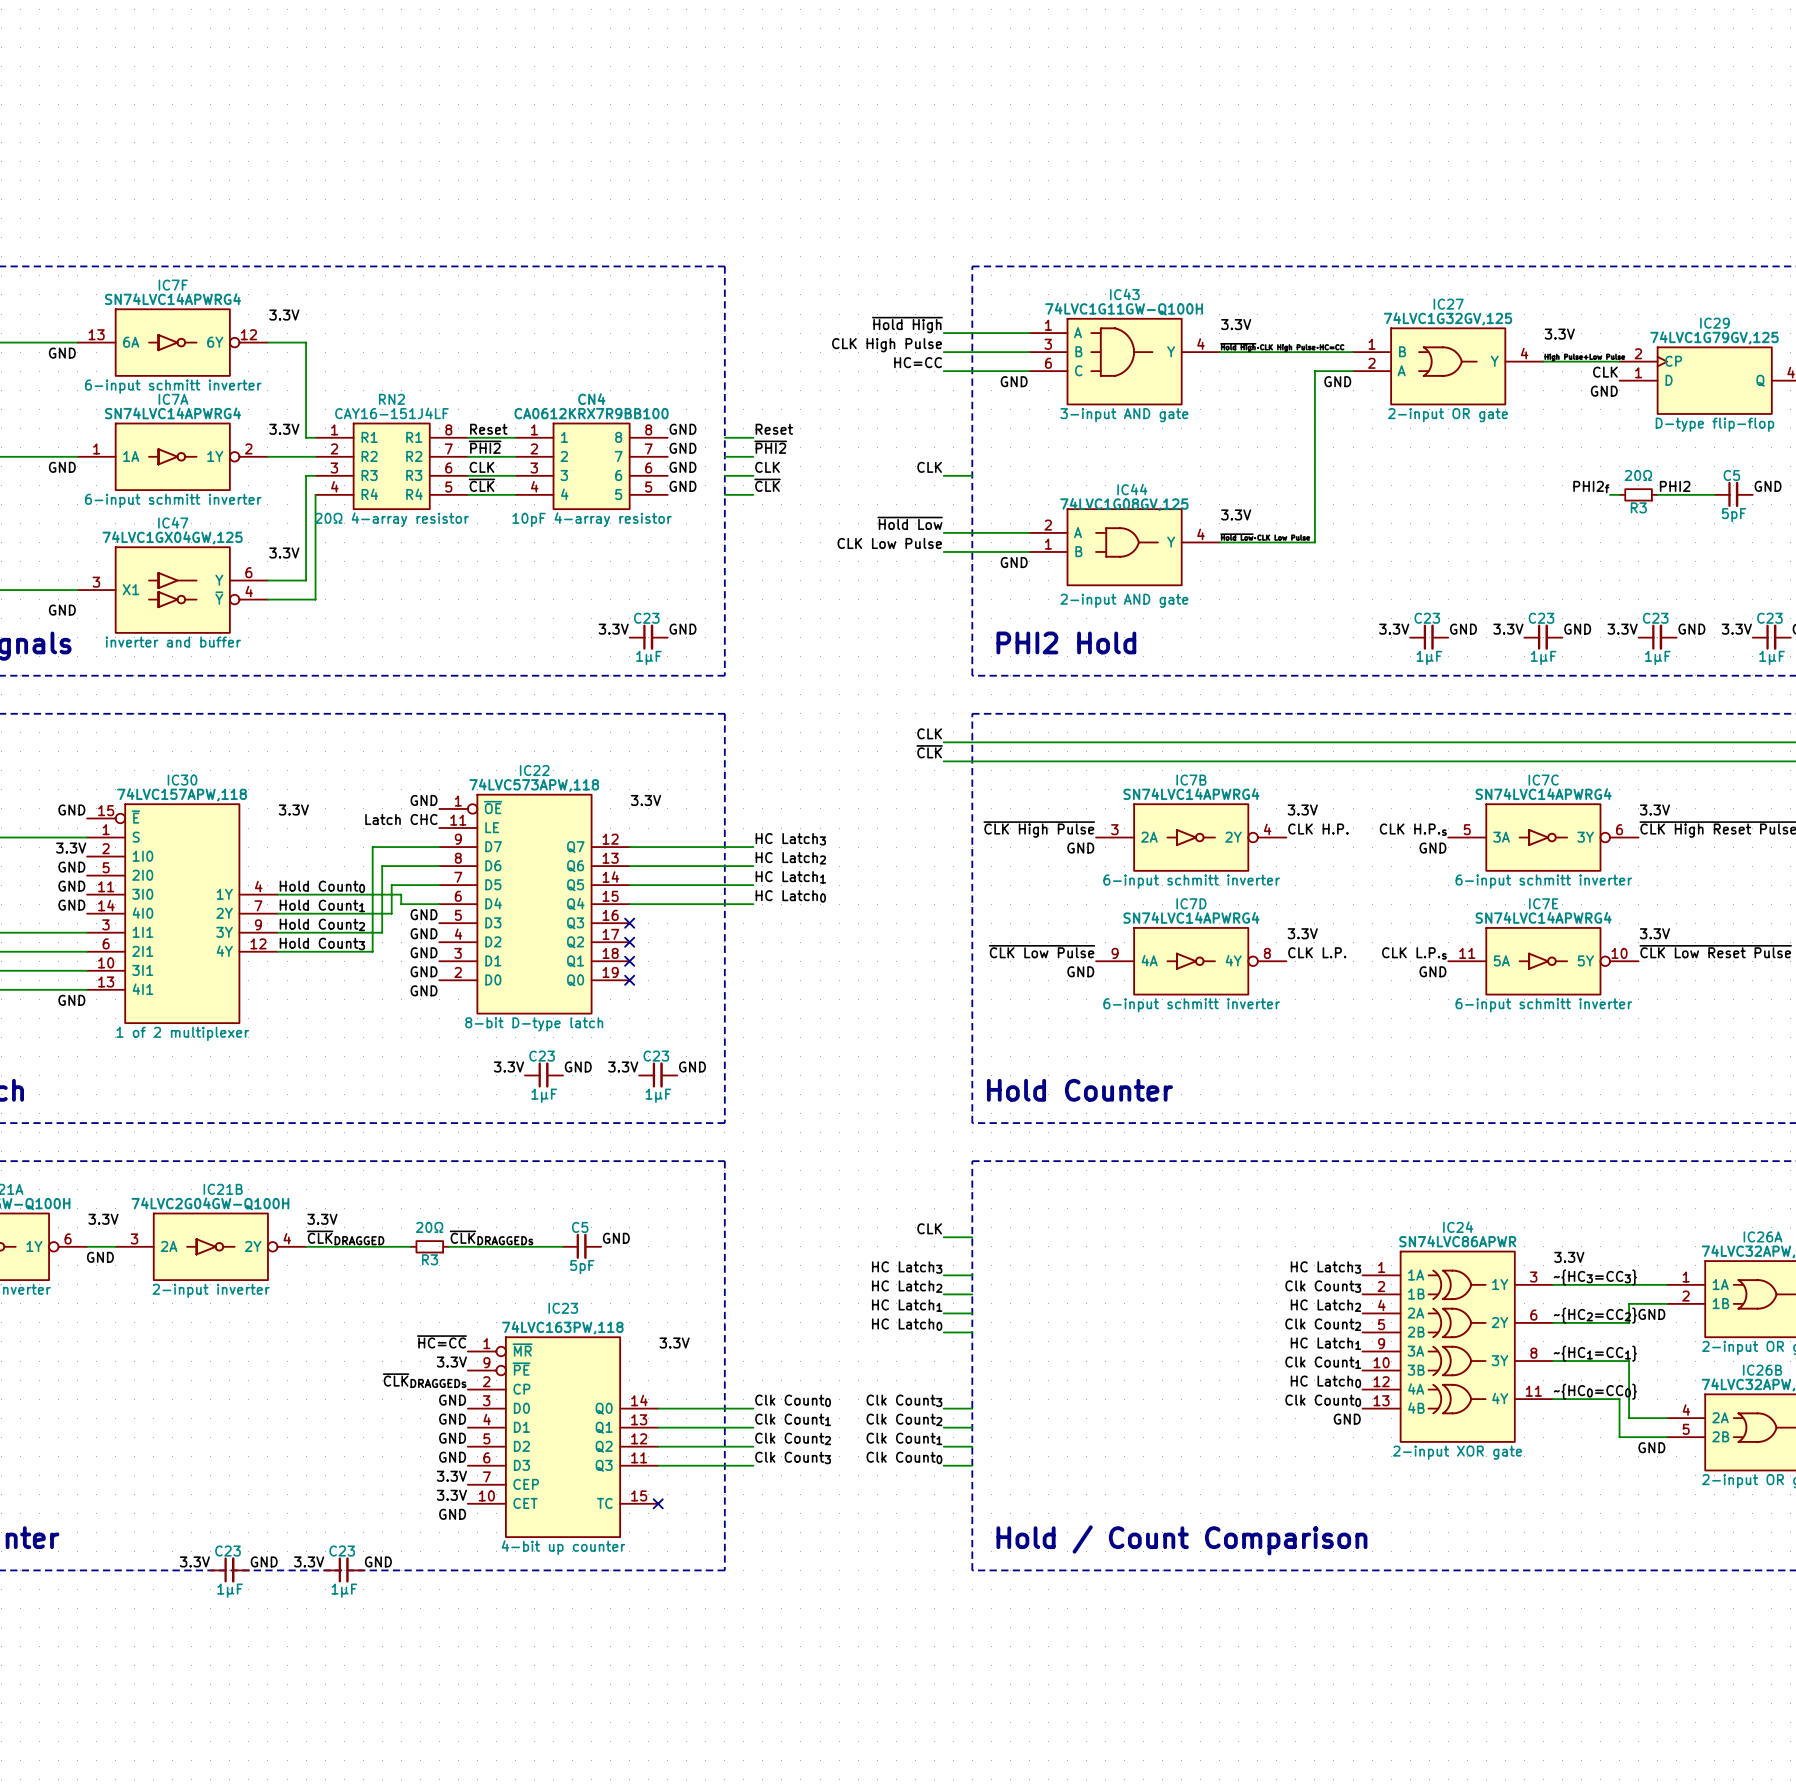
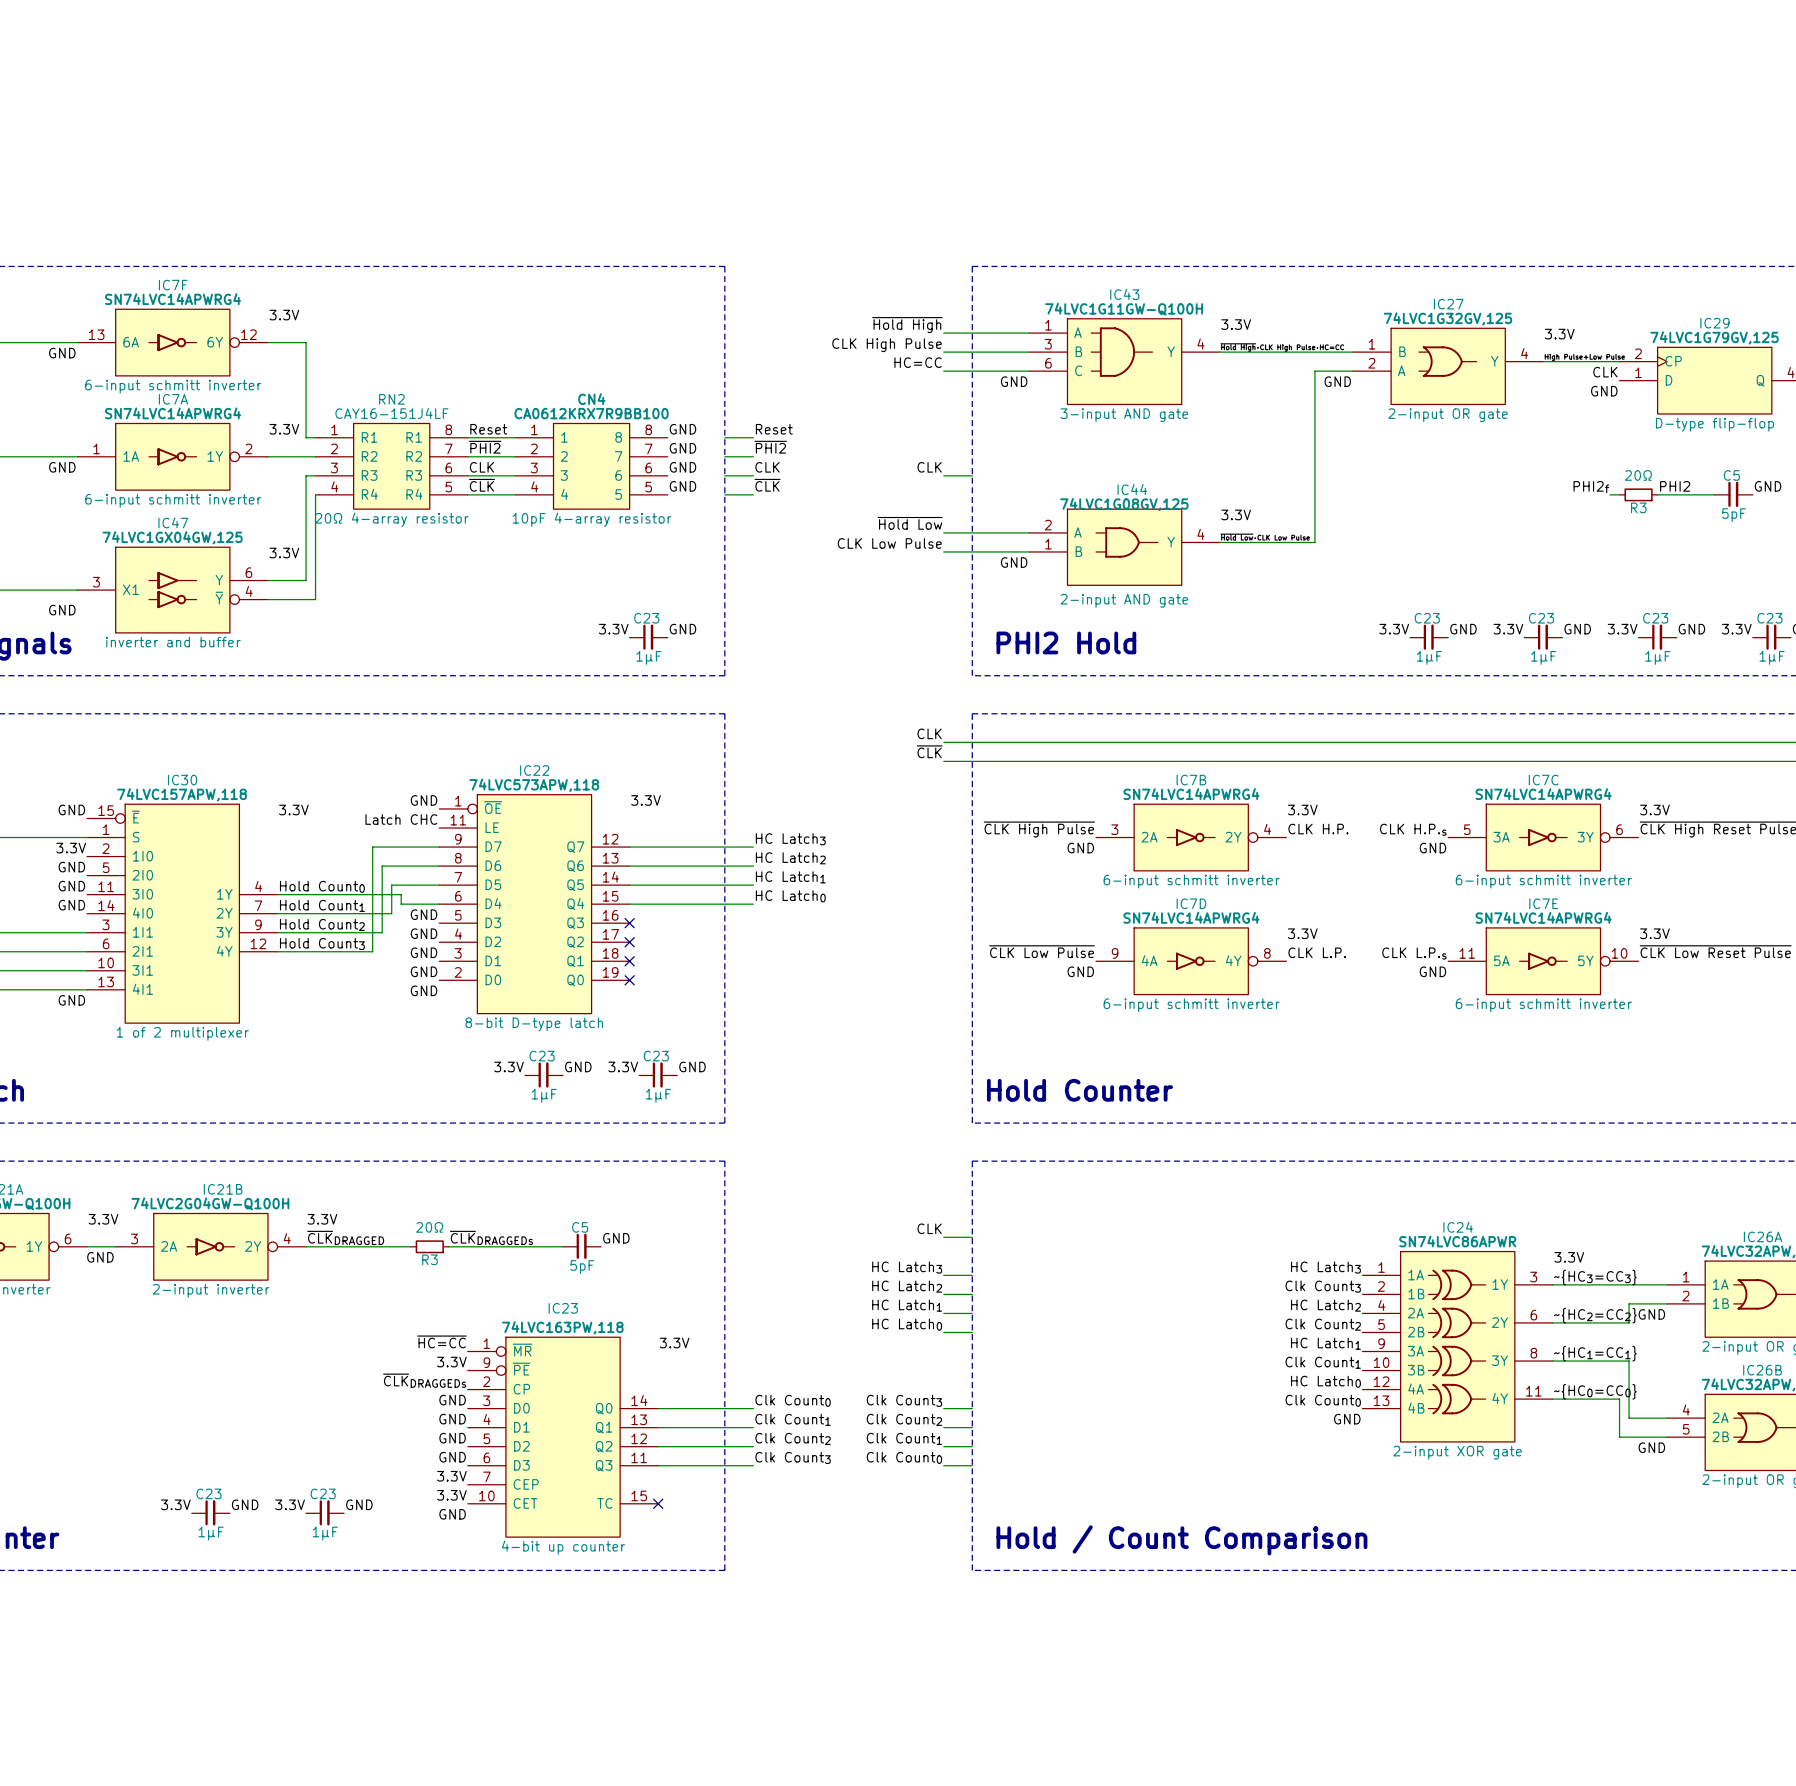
label: none -> 3.3V (175, 1504)
label: none -> GND (245, 1504)
label: none -> 3.3V (290, 1504)
label: none -> GND (359, 1504)
C23: none -> 1μF (210, 1512)
C23: none -> 1μF (325, 1512)
label: 3.3V (194, 1561) -> none
label: GND (264, 1561) -> none
label: 3.3V (309, 1561) -> none
label: GND (378, 1561) -> none
C23: 1μF (229, 1569) -> none
C23: 1μF (344, 1569) -> none

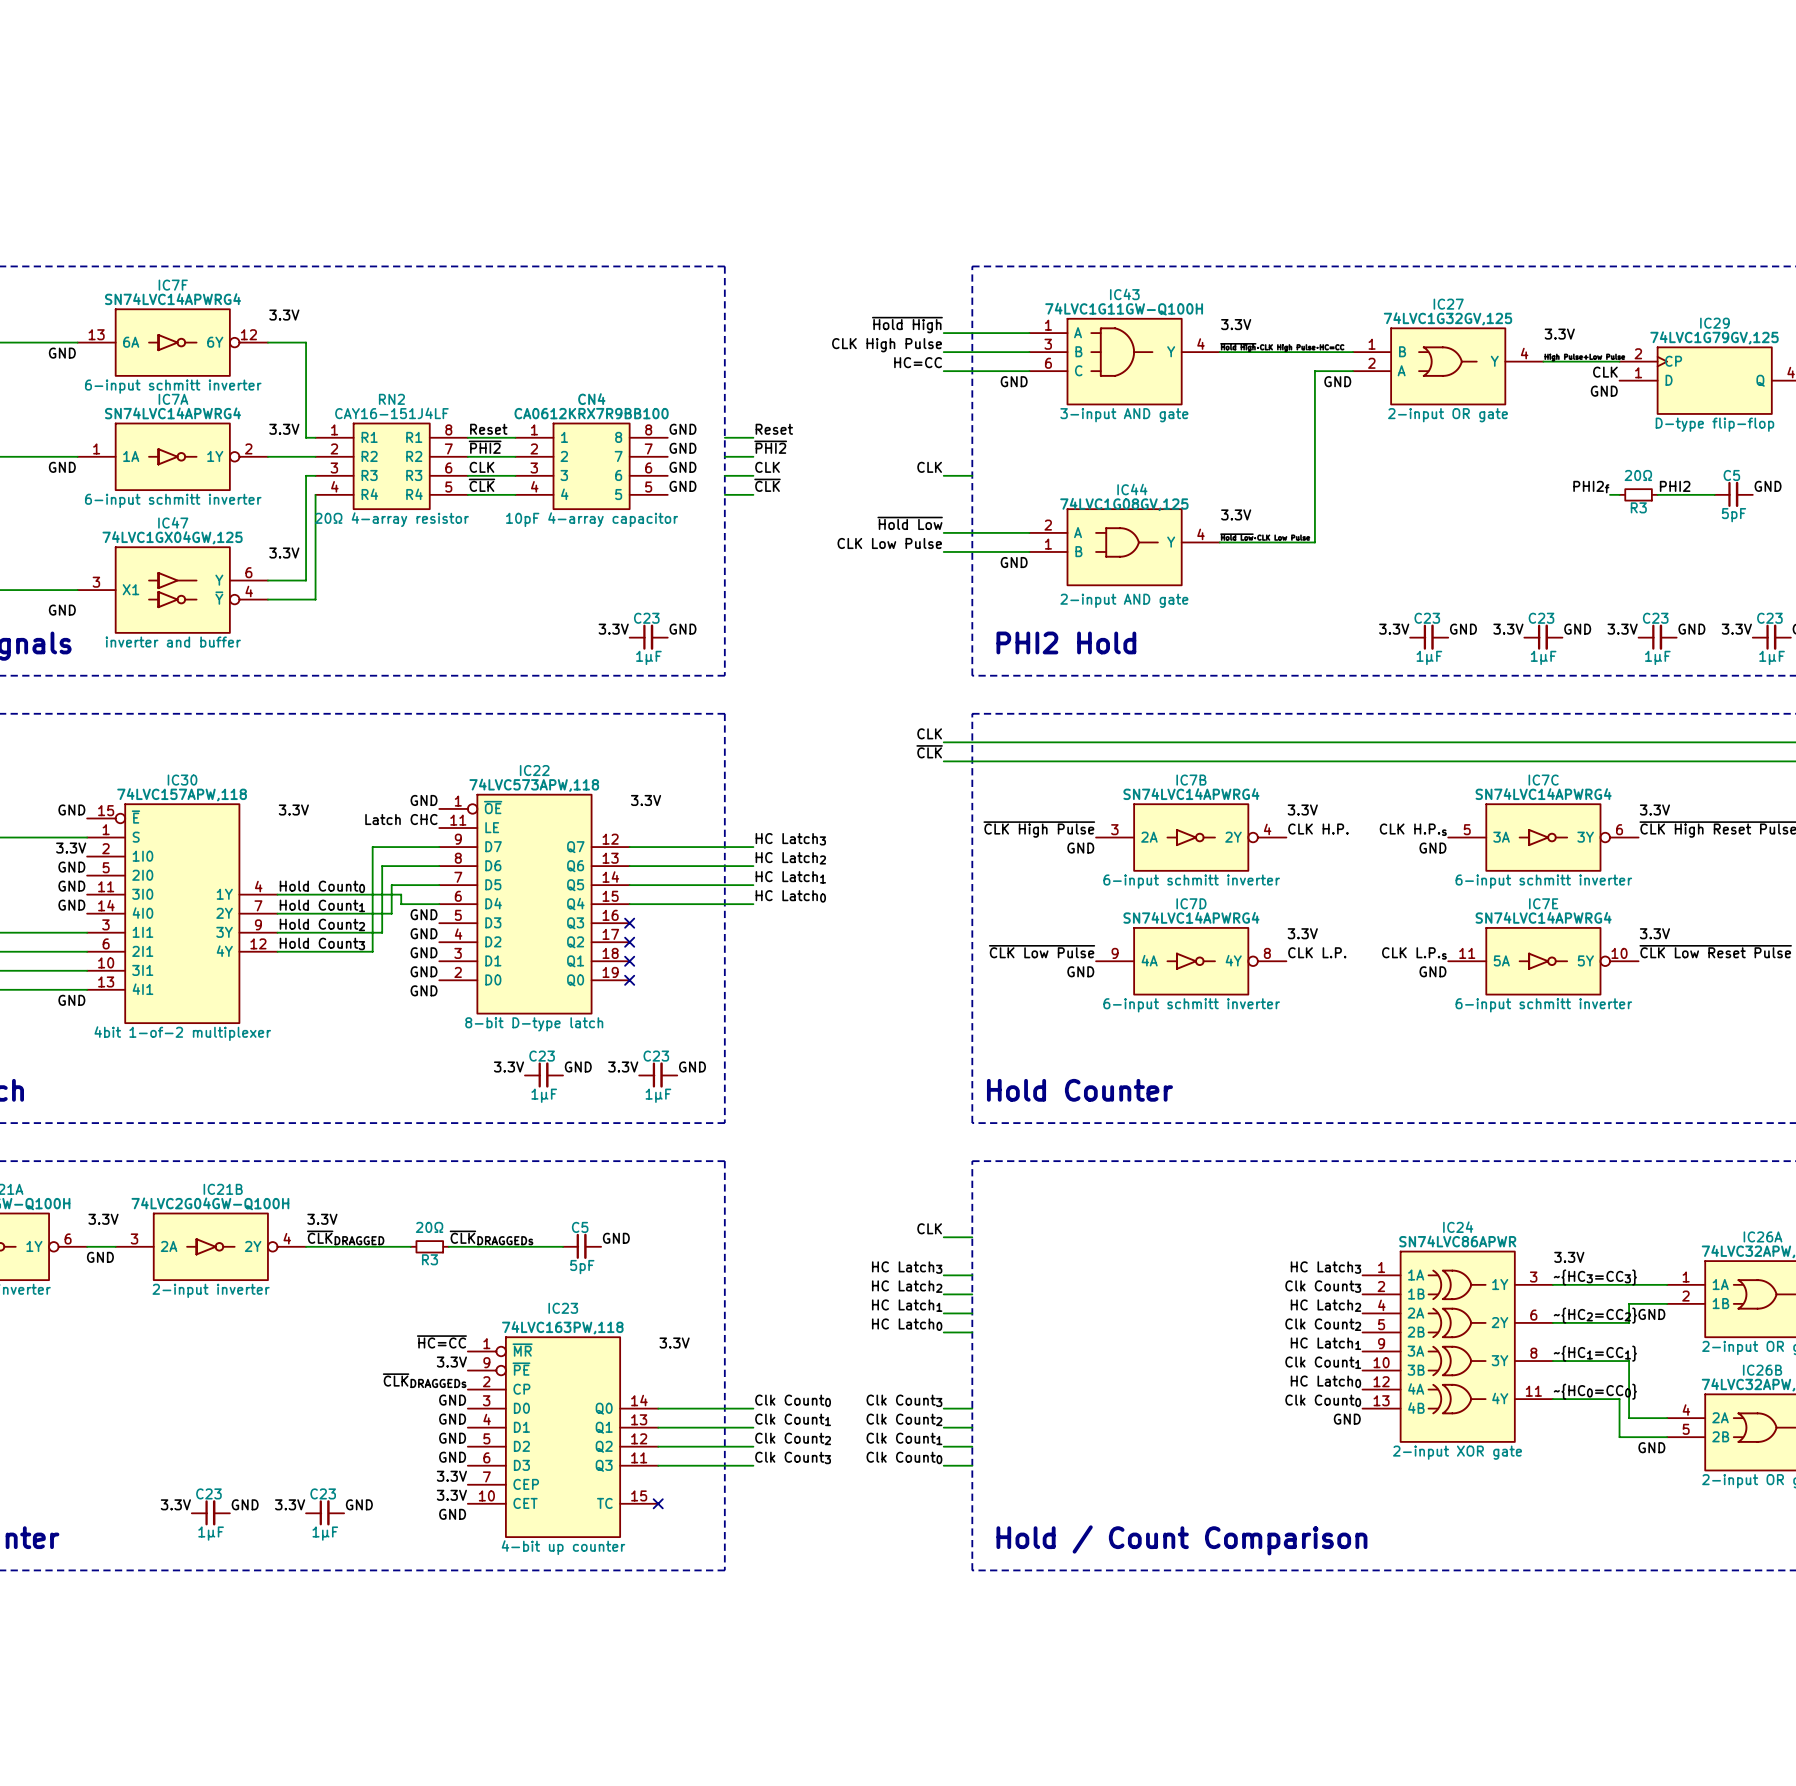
CN4 text: 10pF 4-array resistor (592, 519) -> 10pF 4-array capacitor (592, 519)
IC30 text: 1 of 2 multiplexer (182, 1033) -> 4bit 1-of-2 multiplexer (182, 1033)

